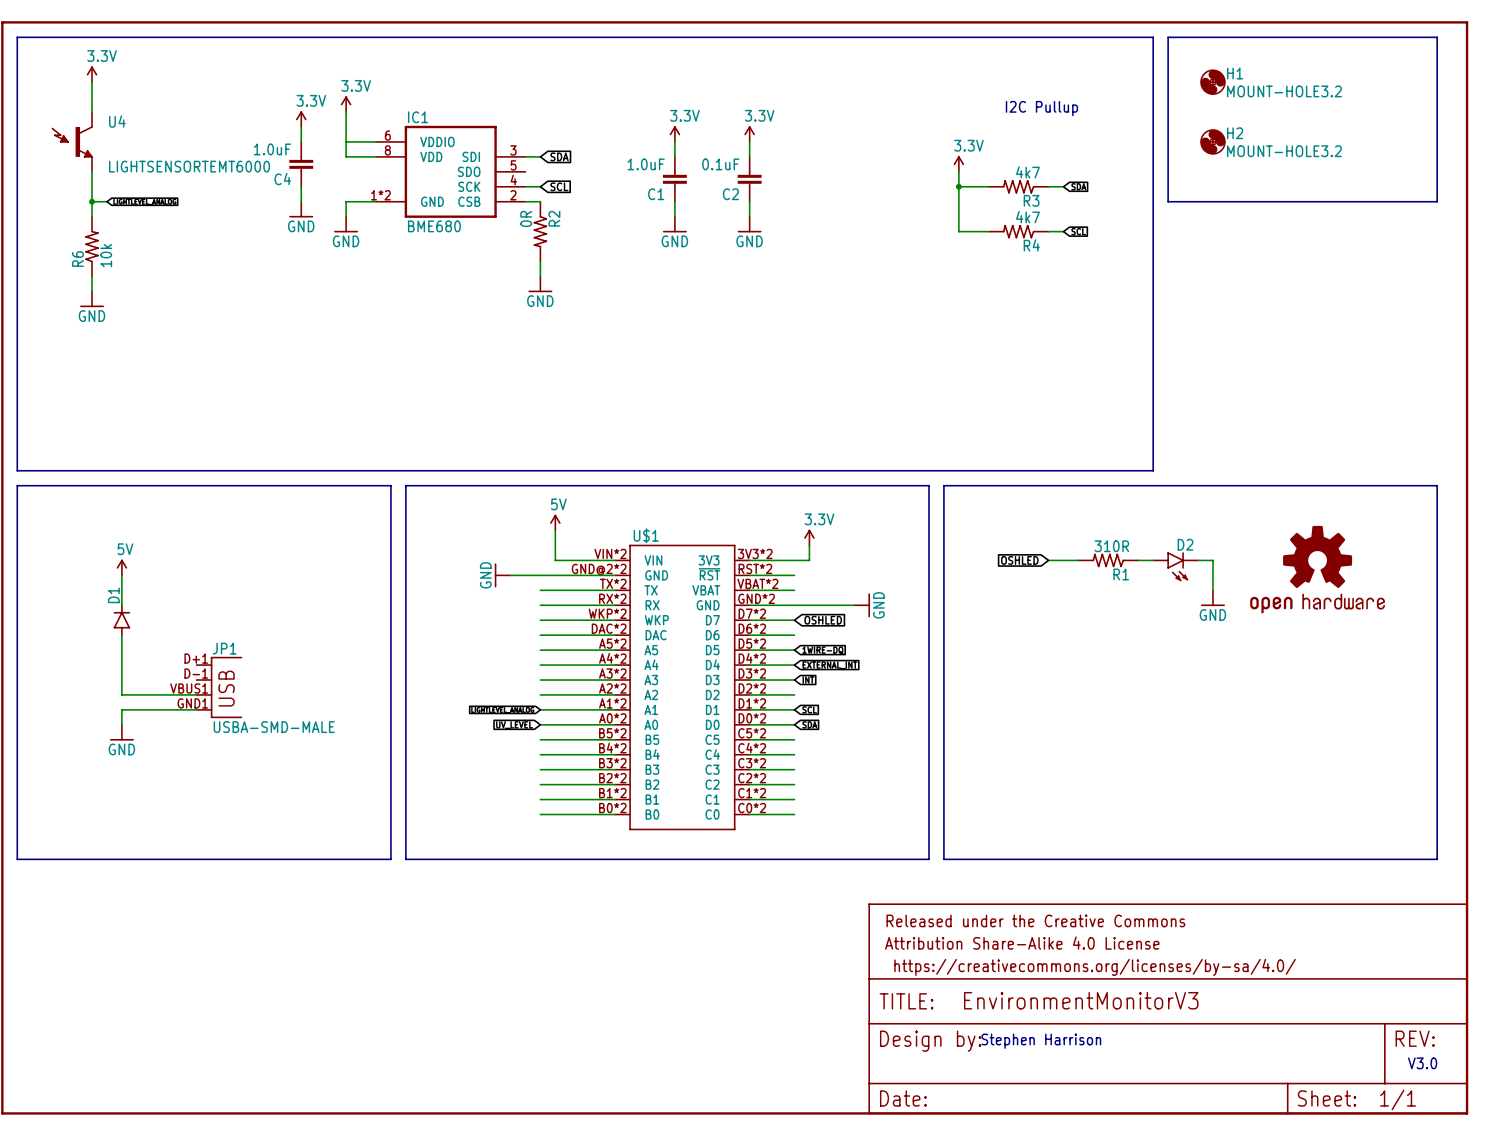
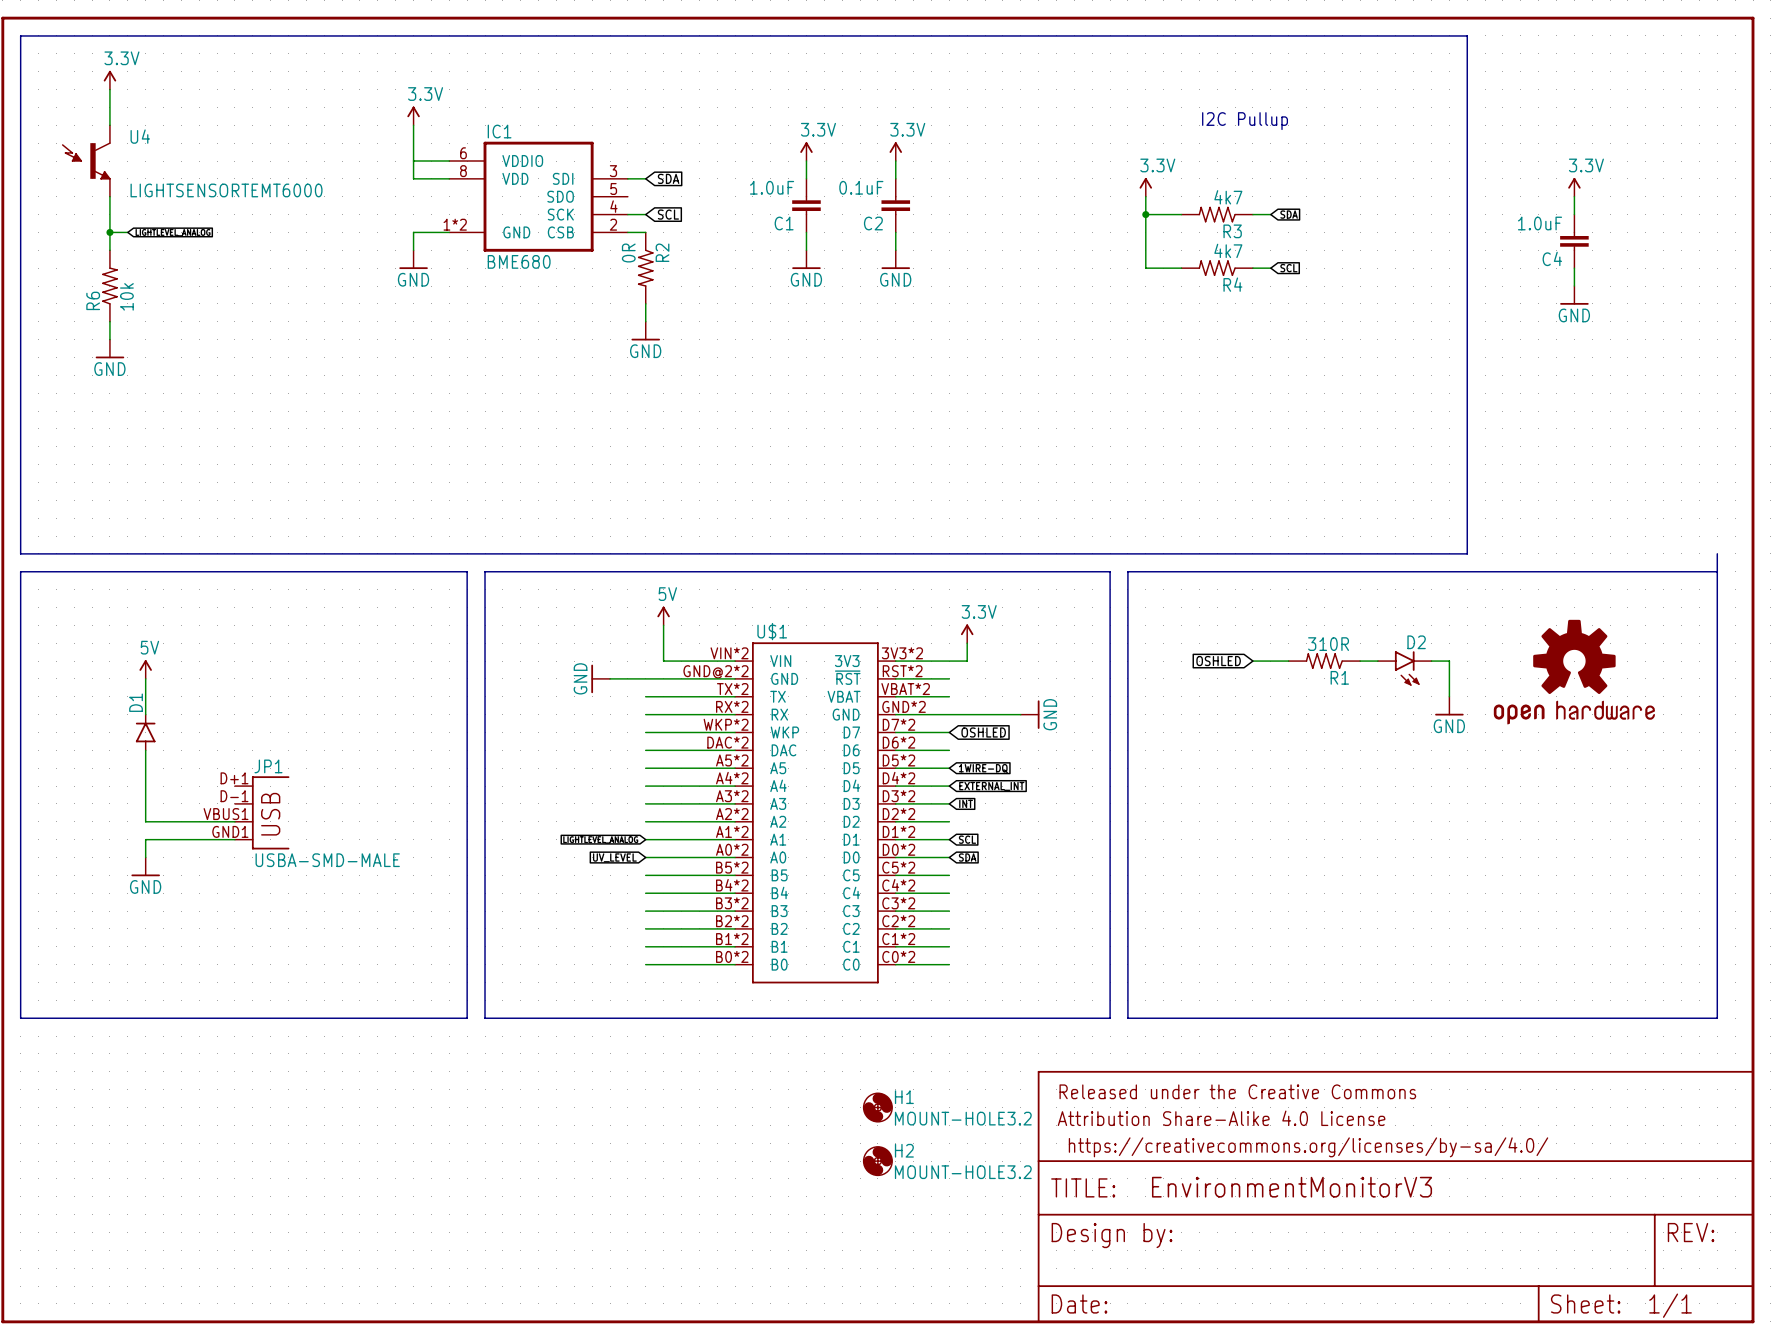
line: (1153, 37) (1153, 470) -> (1467, 35) (1467, 553) (1377, 553)
line: (1168, 37) (1168, 201) (1437, 201) (1437, 37) (1227, 37) -> (1395, 35) (1377, 35)
H1 position: (1212, 82) -> (877, 1107)
power symbol: 3.3V (301, 119) -> none
wire: (301, 127) (301, 141) -> none
H2 position: (1212, 141) -> (877, 1161)
C4 position: (301, 164) -> (1574, 241)
power symbol: none -> 3.3V (1574, 187)
wire: none -> (1574, 196) (1574, 214)
wire: (301, 186) (301, 201) -> none
power symbol: GND (301, 209) -> none
wire: none -> (1574, 268) (1574, 286)
power symbol: none -> GND (1574, 295)
line: none -> (1717, 553) (1717, 571)
text: Stephen Harrison (1041, 1041) -> none
text: V3.0 (1422, 1063) -> none

